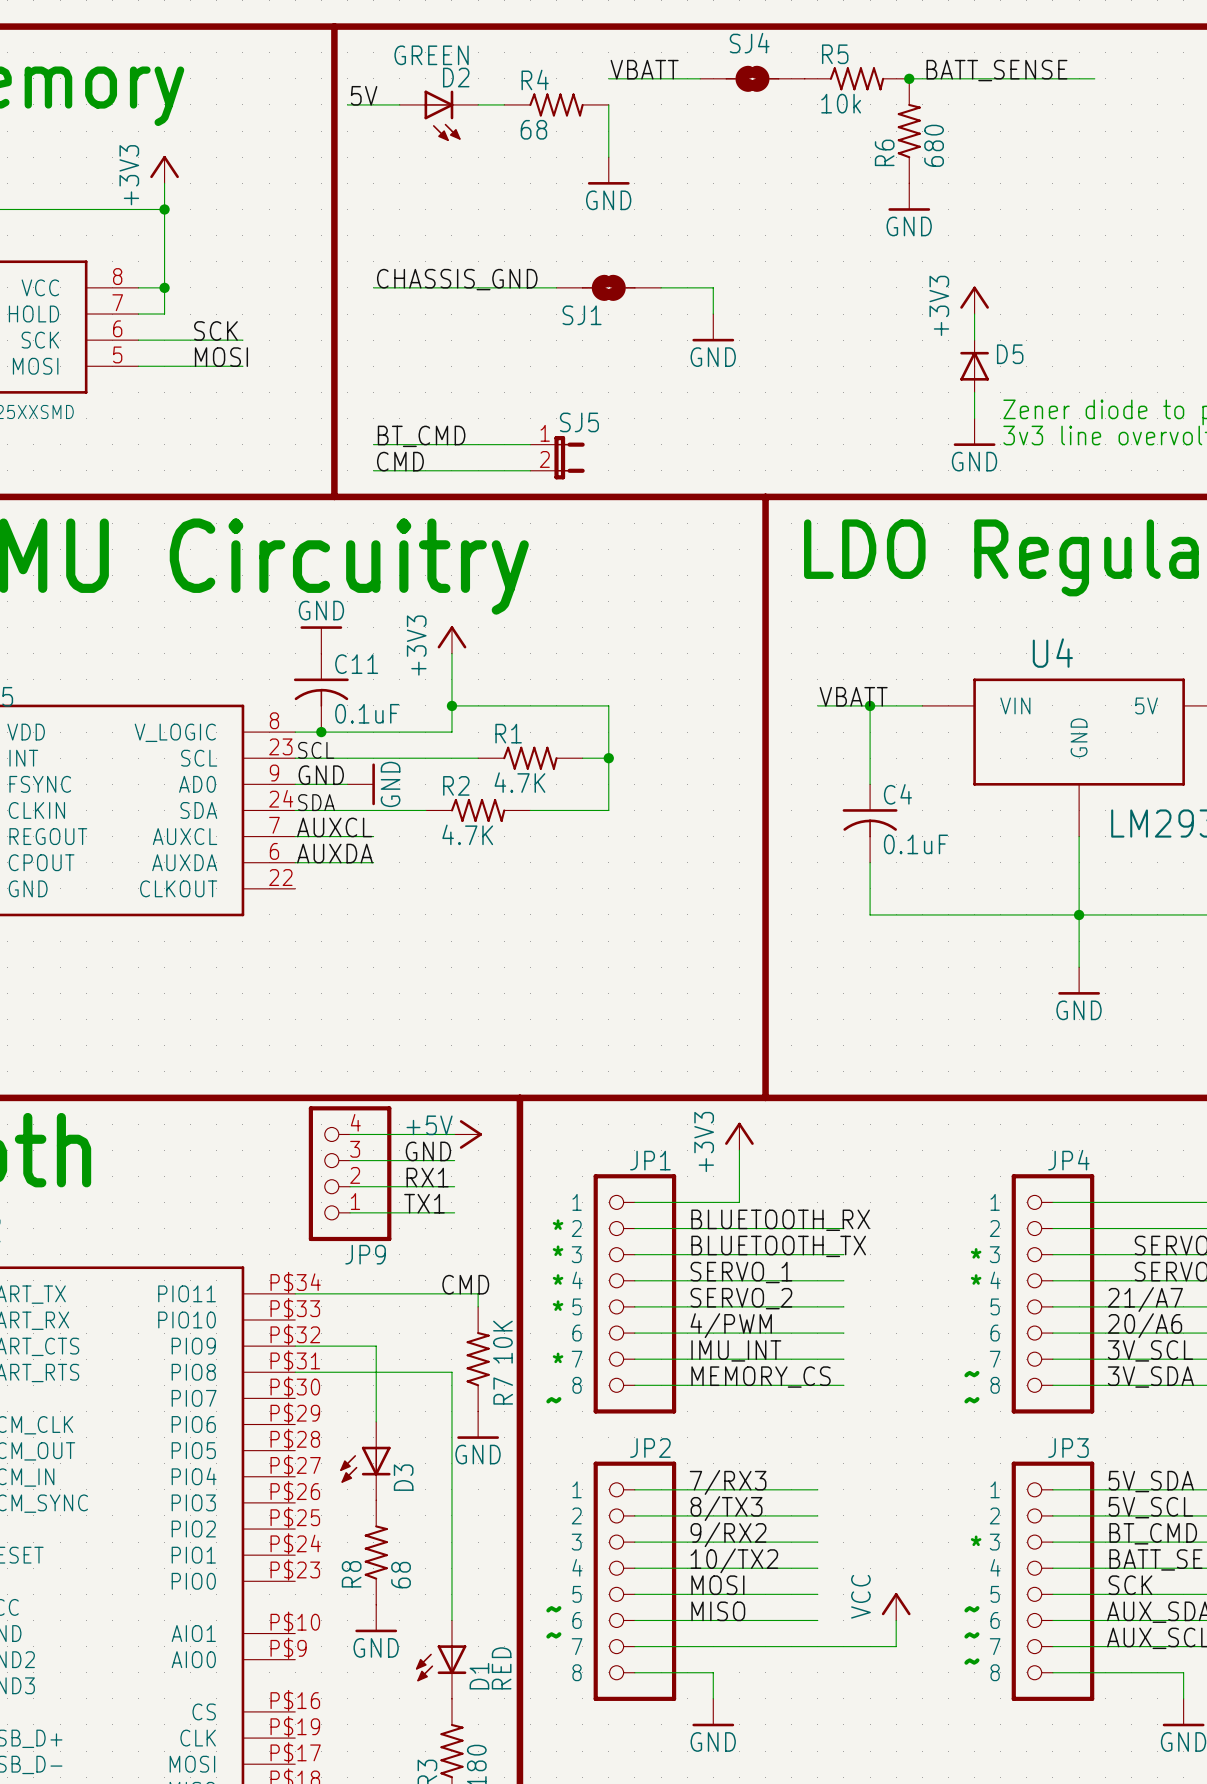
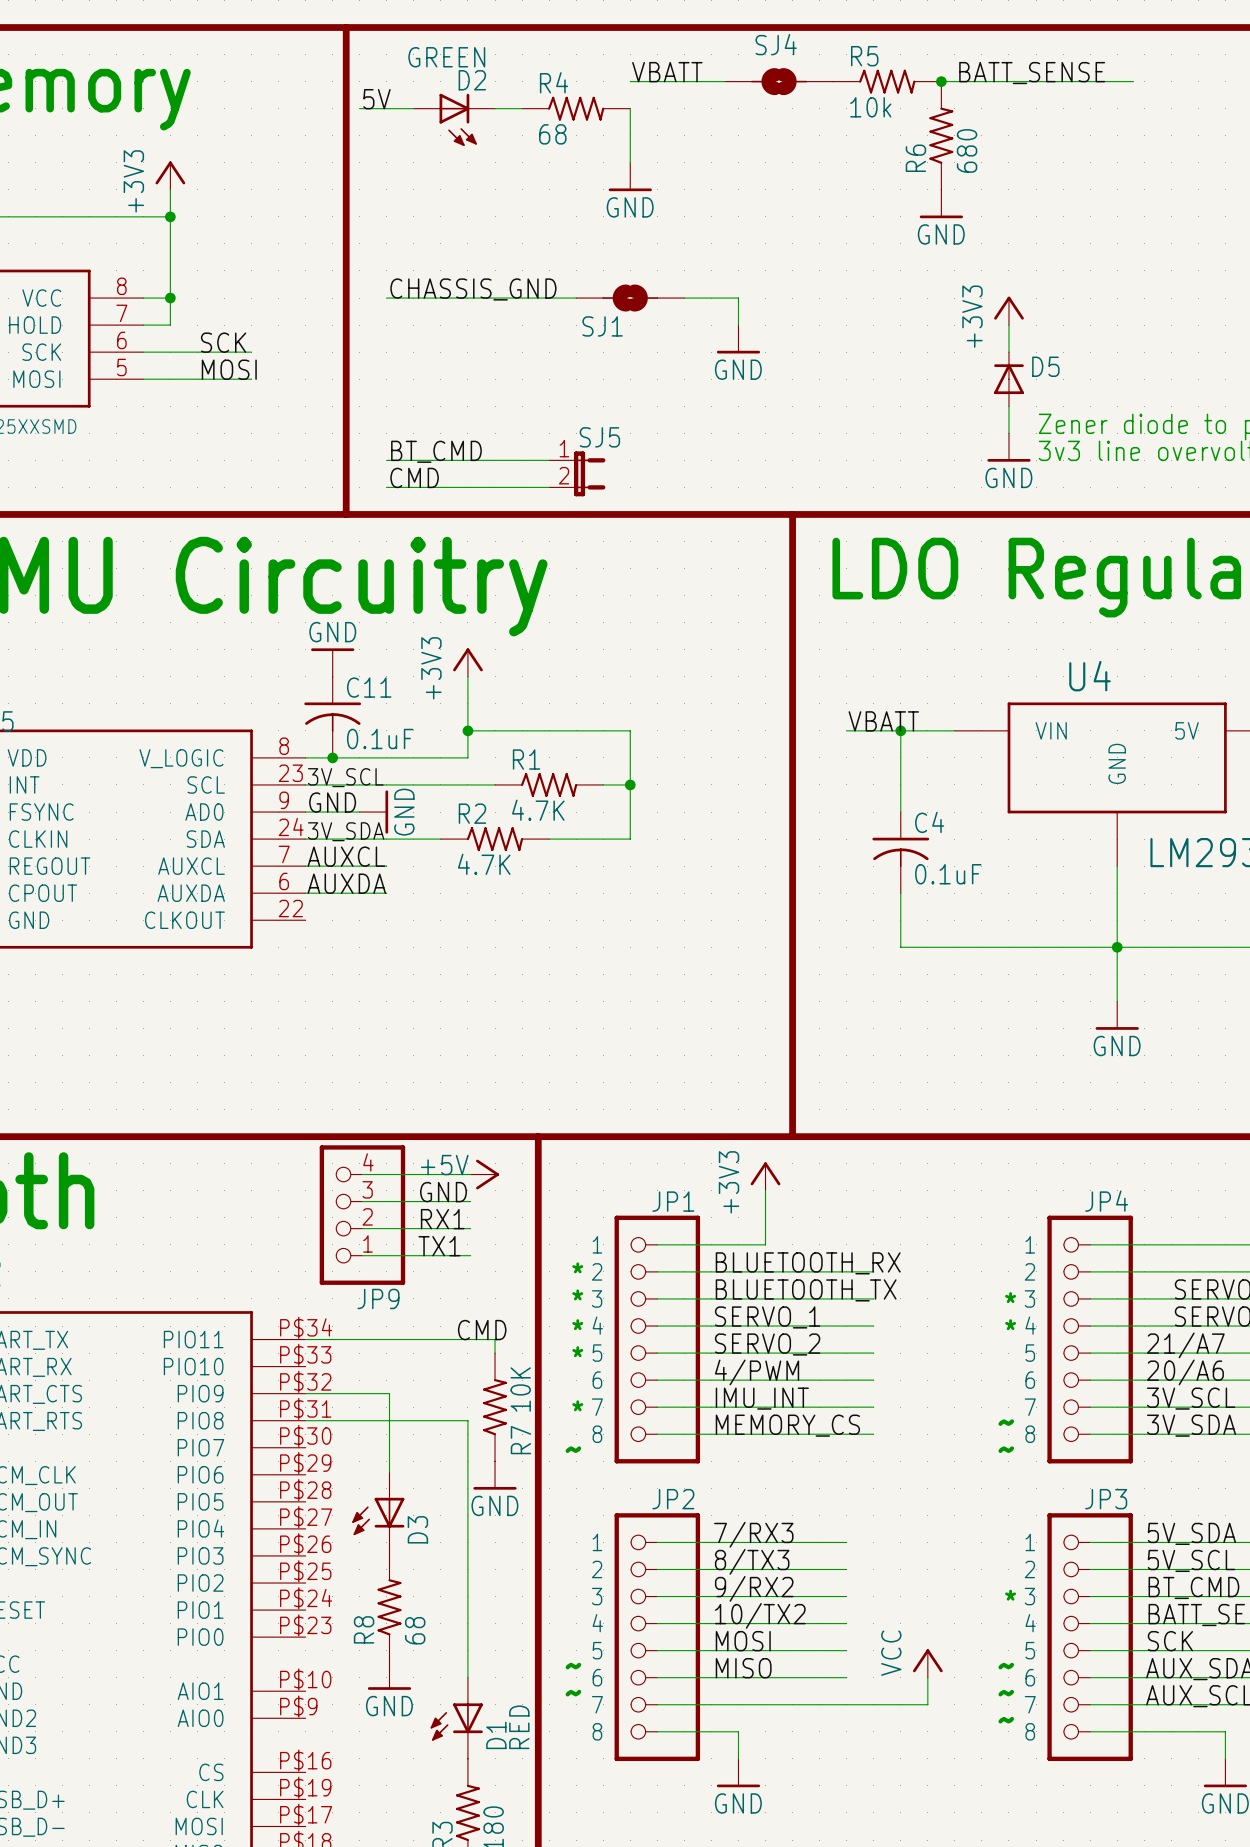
label: SCL (316, 750) -> 3V_SCL (345, 777)
label: SDA (316, 802) -> 3V_SDA (346, 831)

